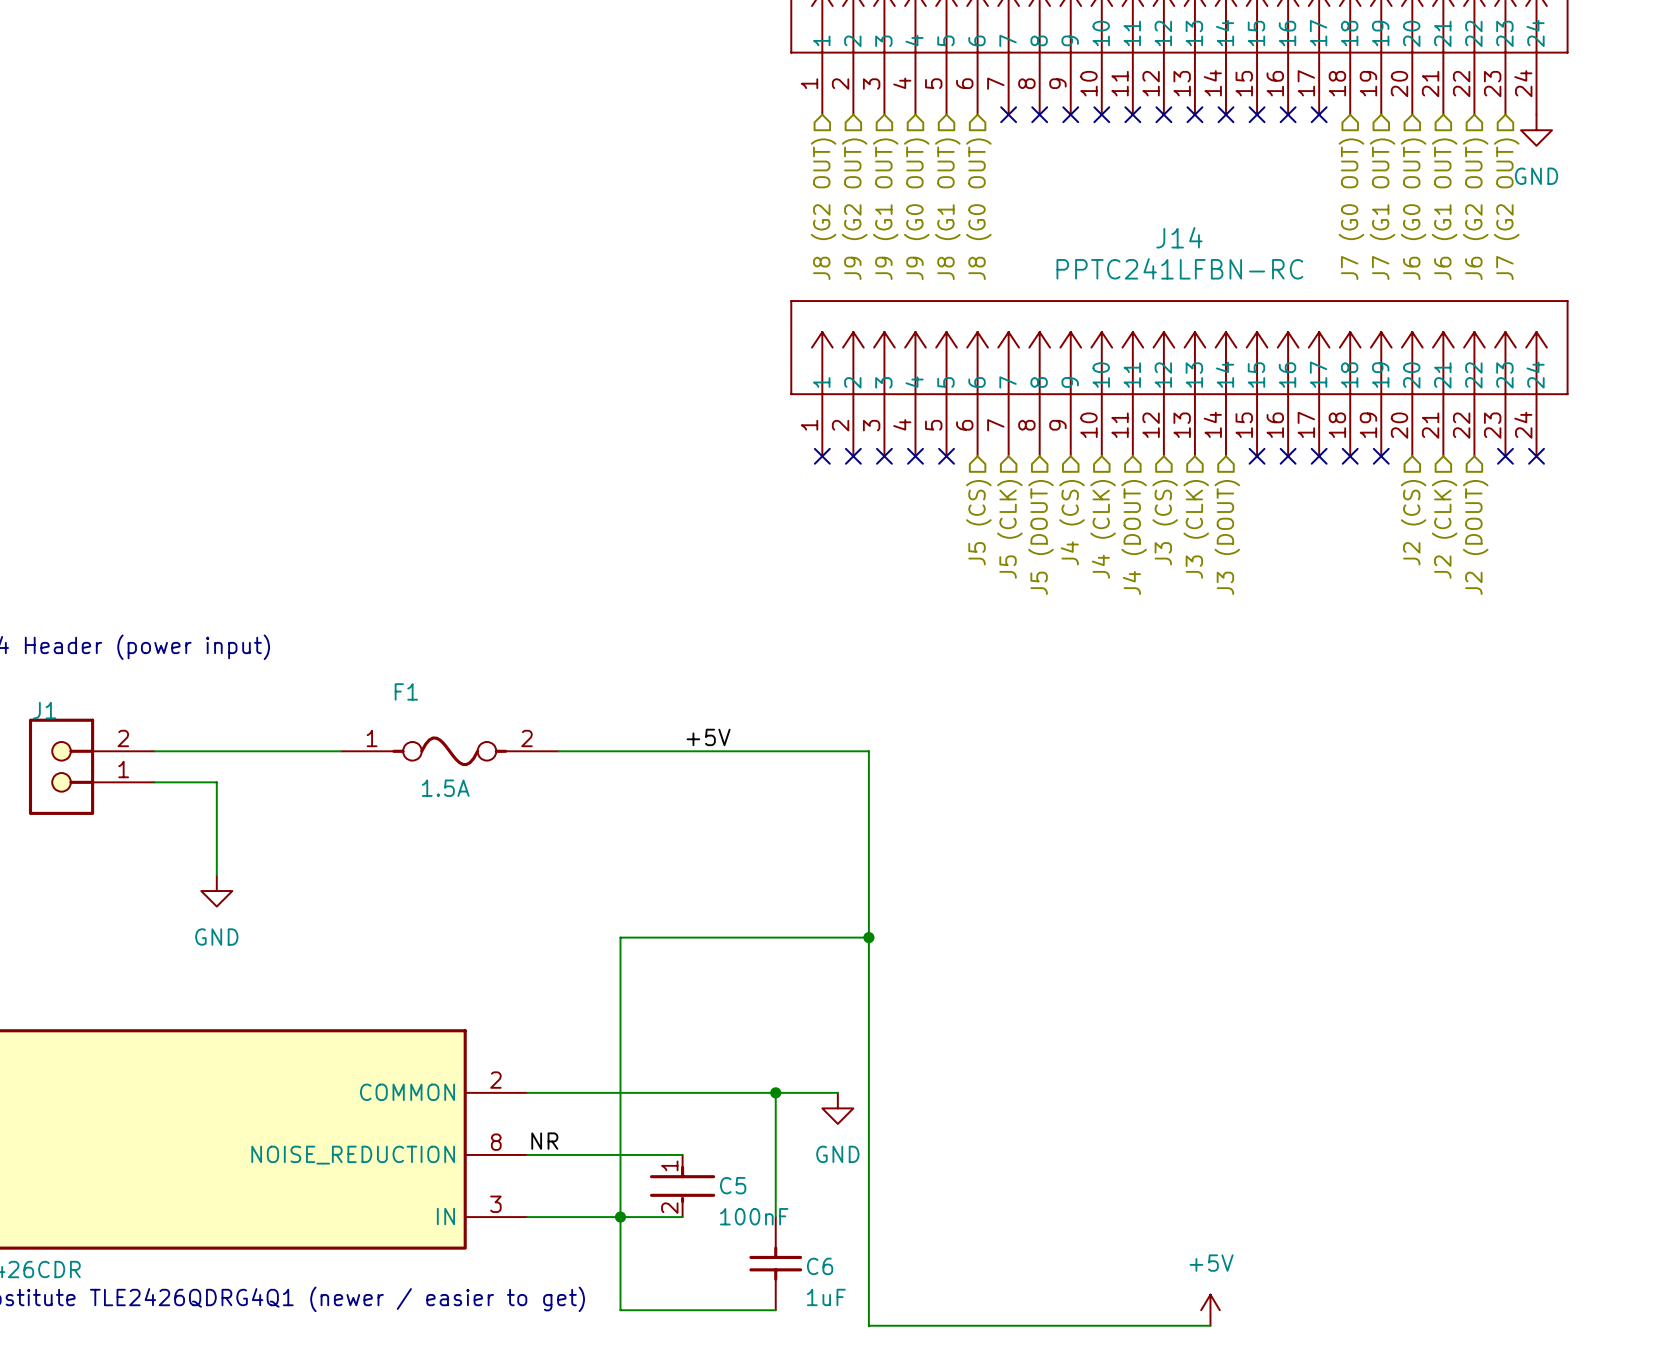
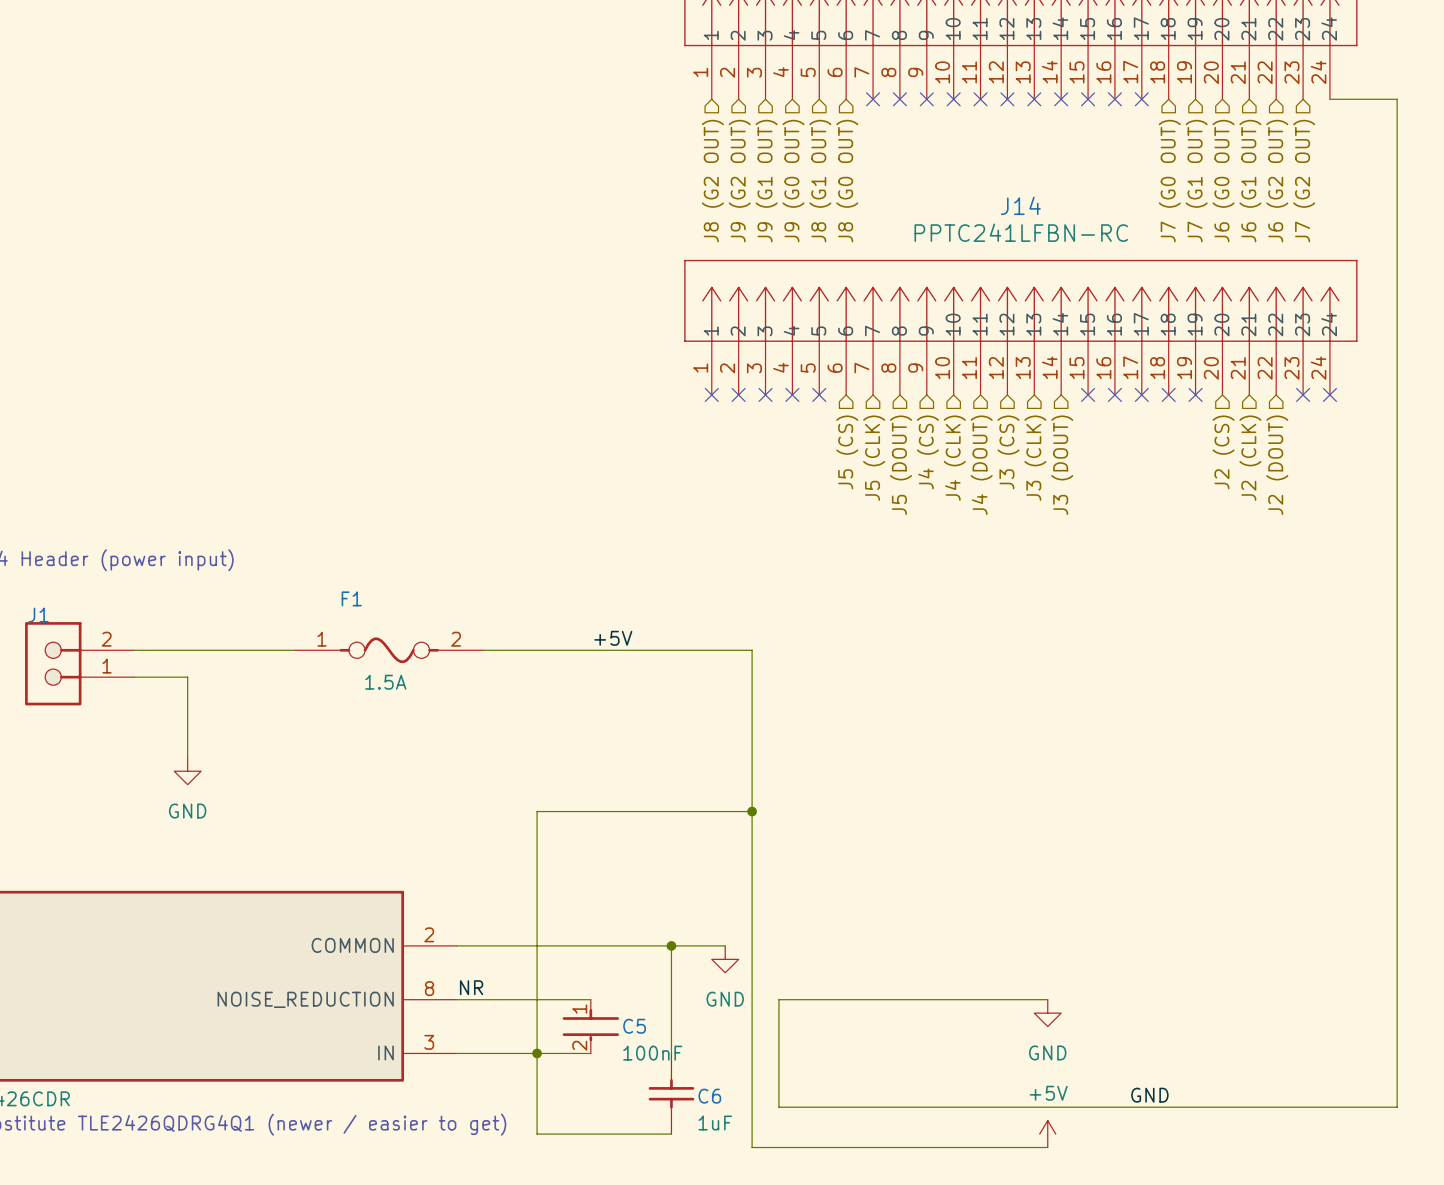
wire: none -> (1329, 99) (1397, 99) (1397, 1107) (778, 1107) (778, 999) (1047, 999)
power symbol: GND (1536, 130) -> none
power symbol: none -> GND (1047, 1013)
label: none -> GND (1149, 1095)

